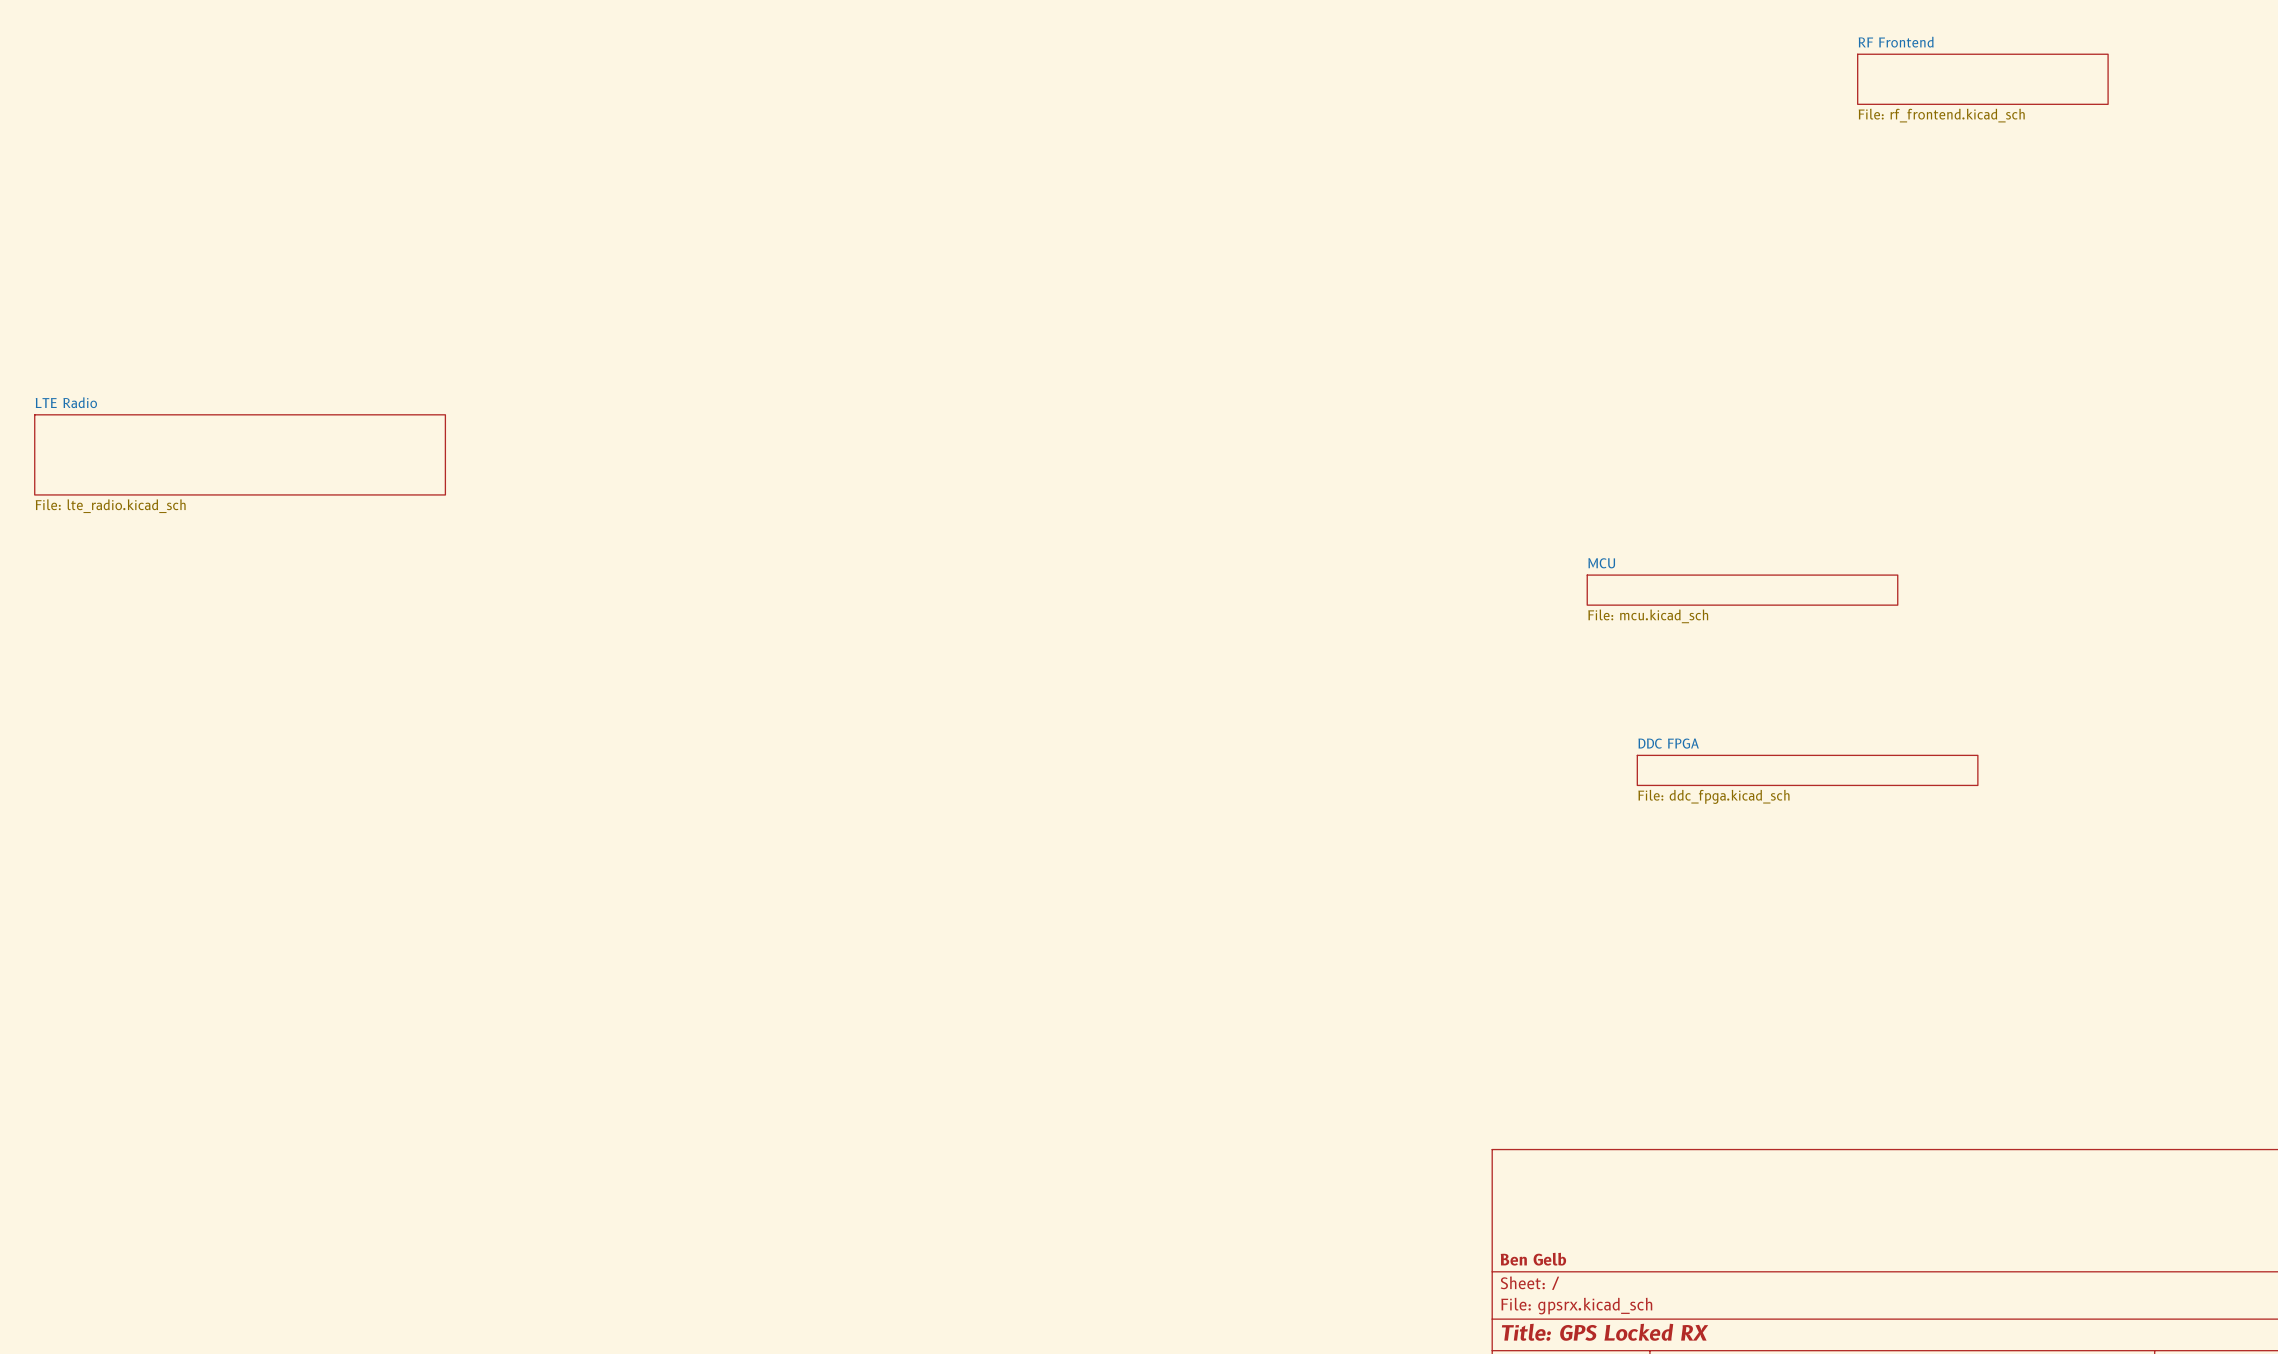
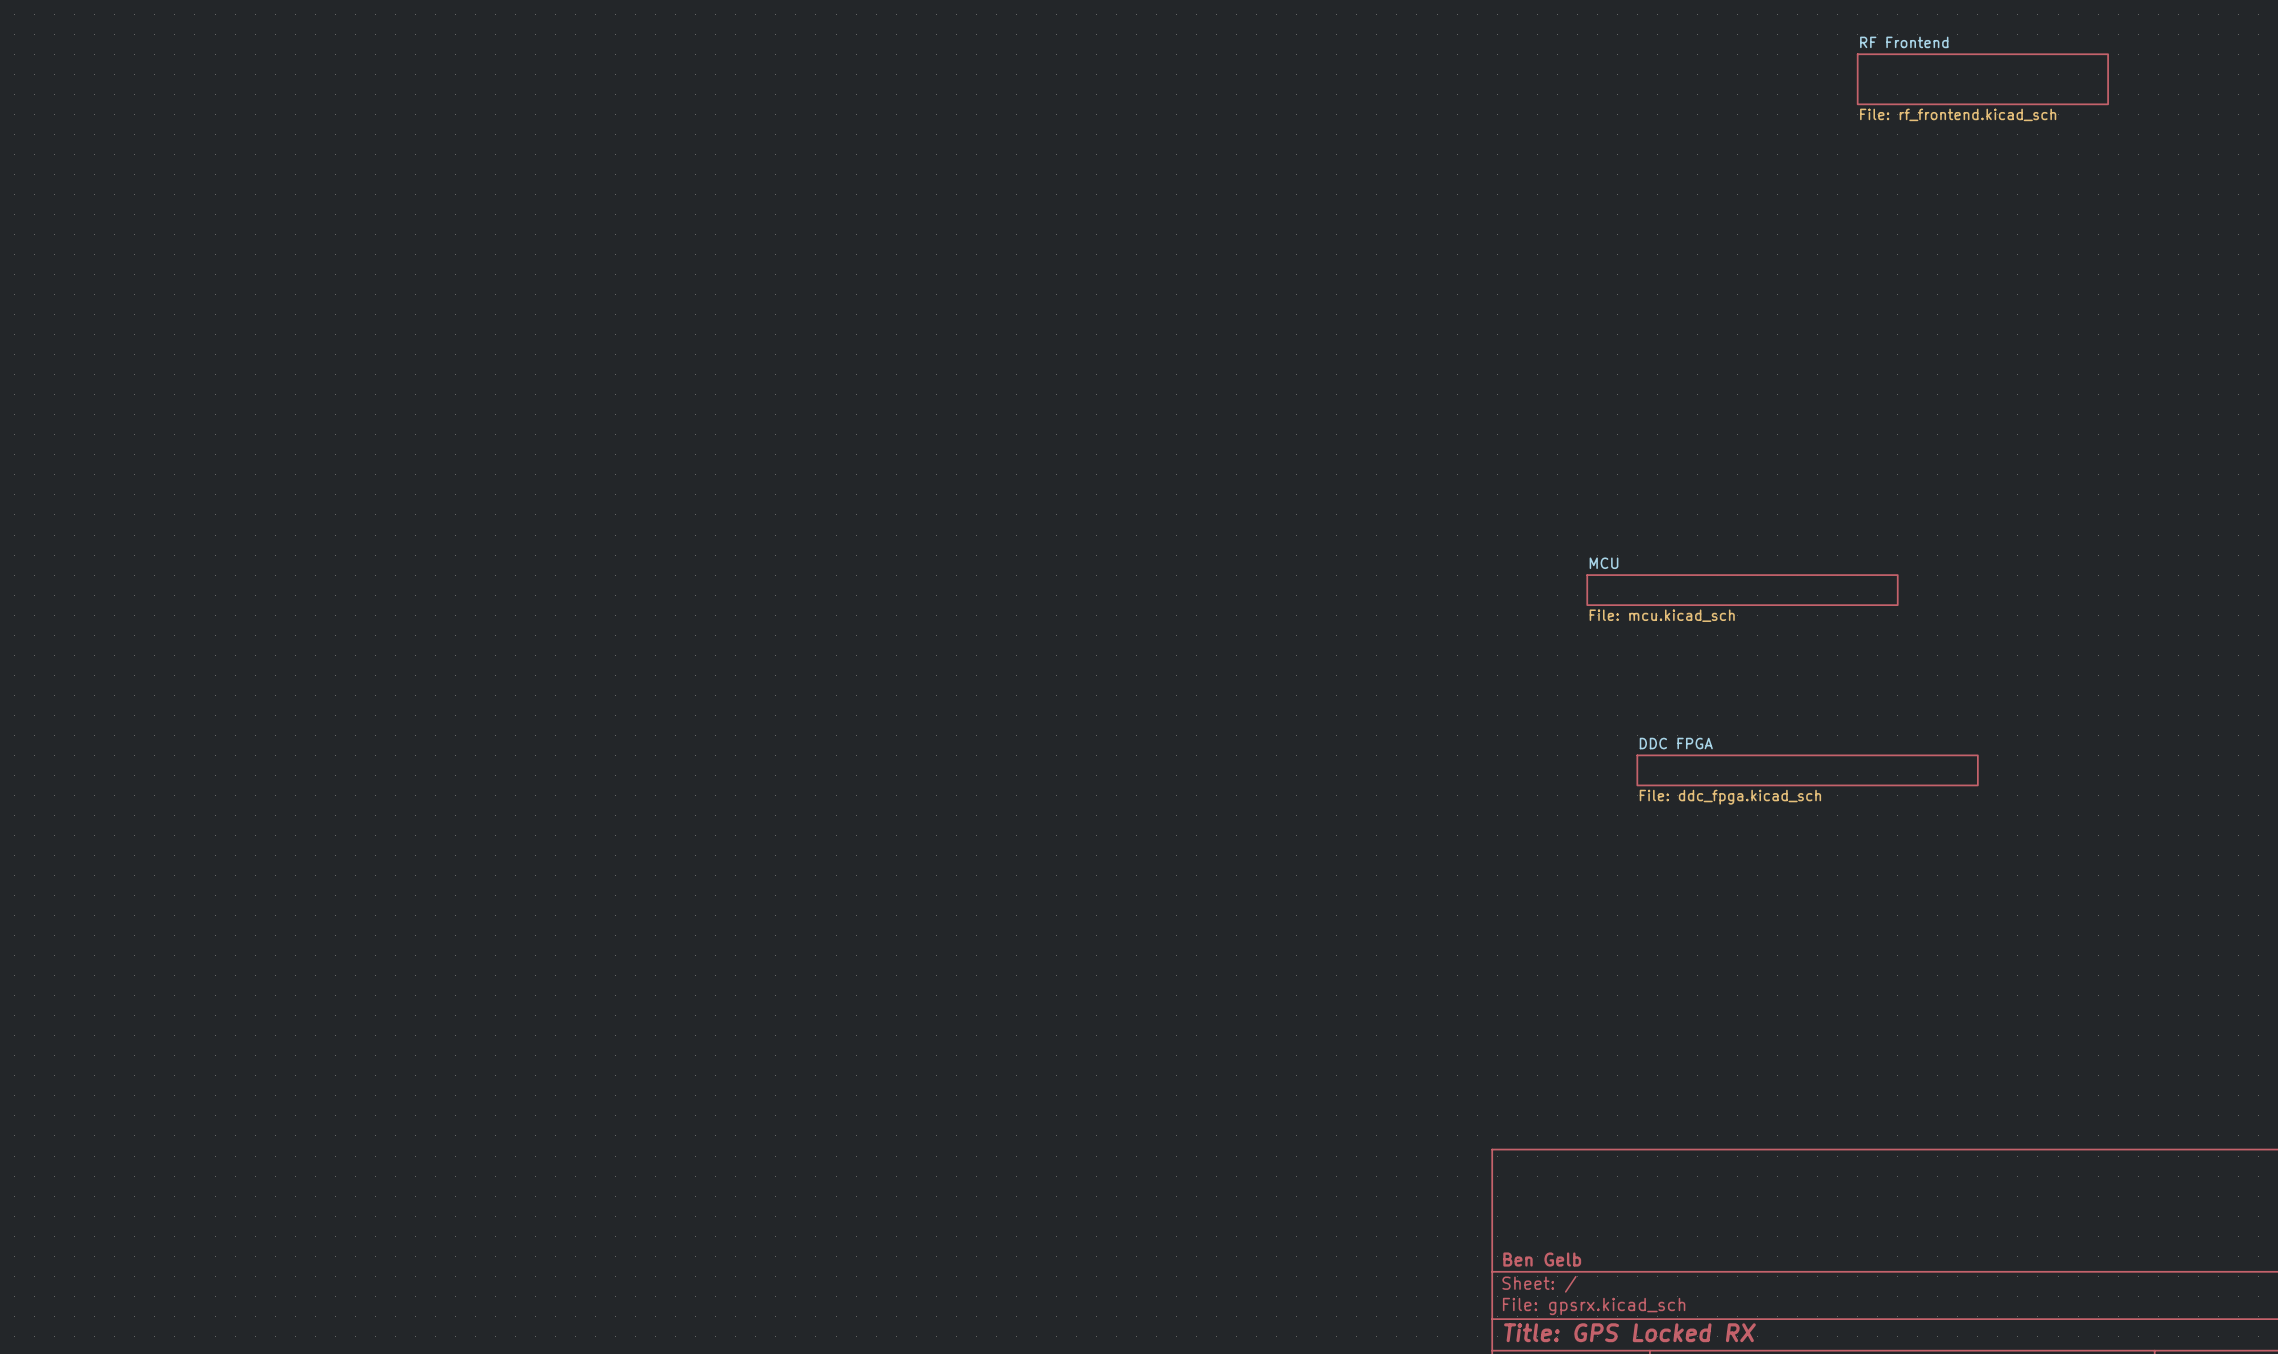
sheet LTE Radio: File: lte_radio.kicad_sch (240, 454) -> none

